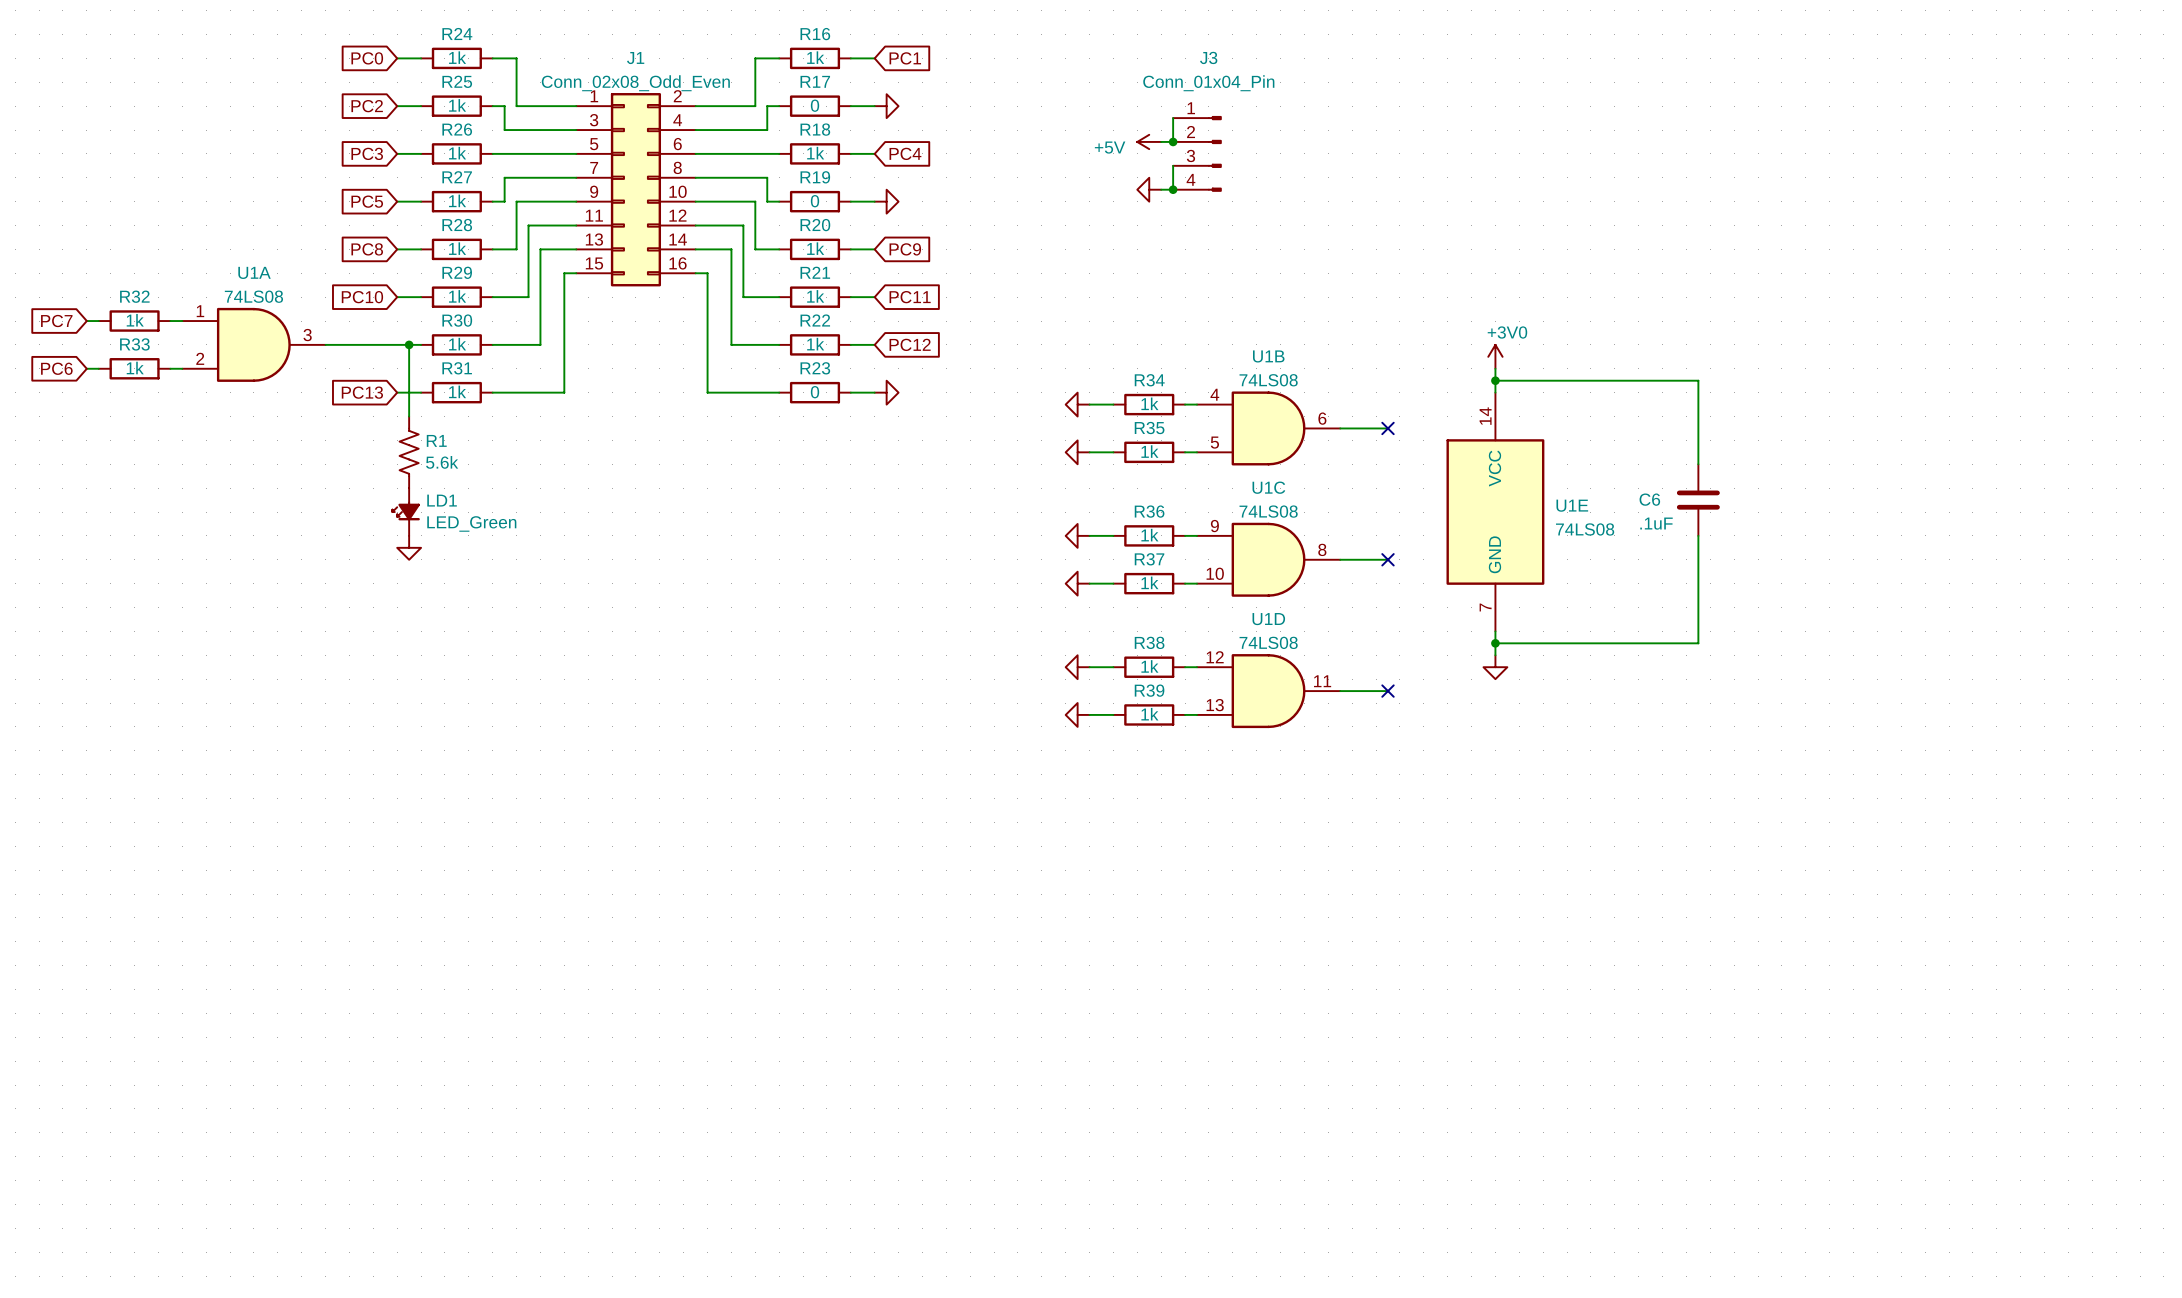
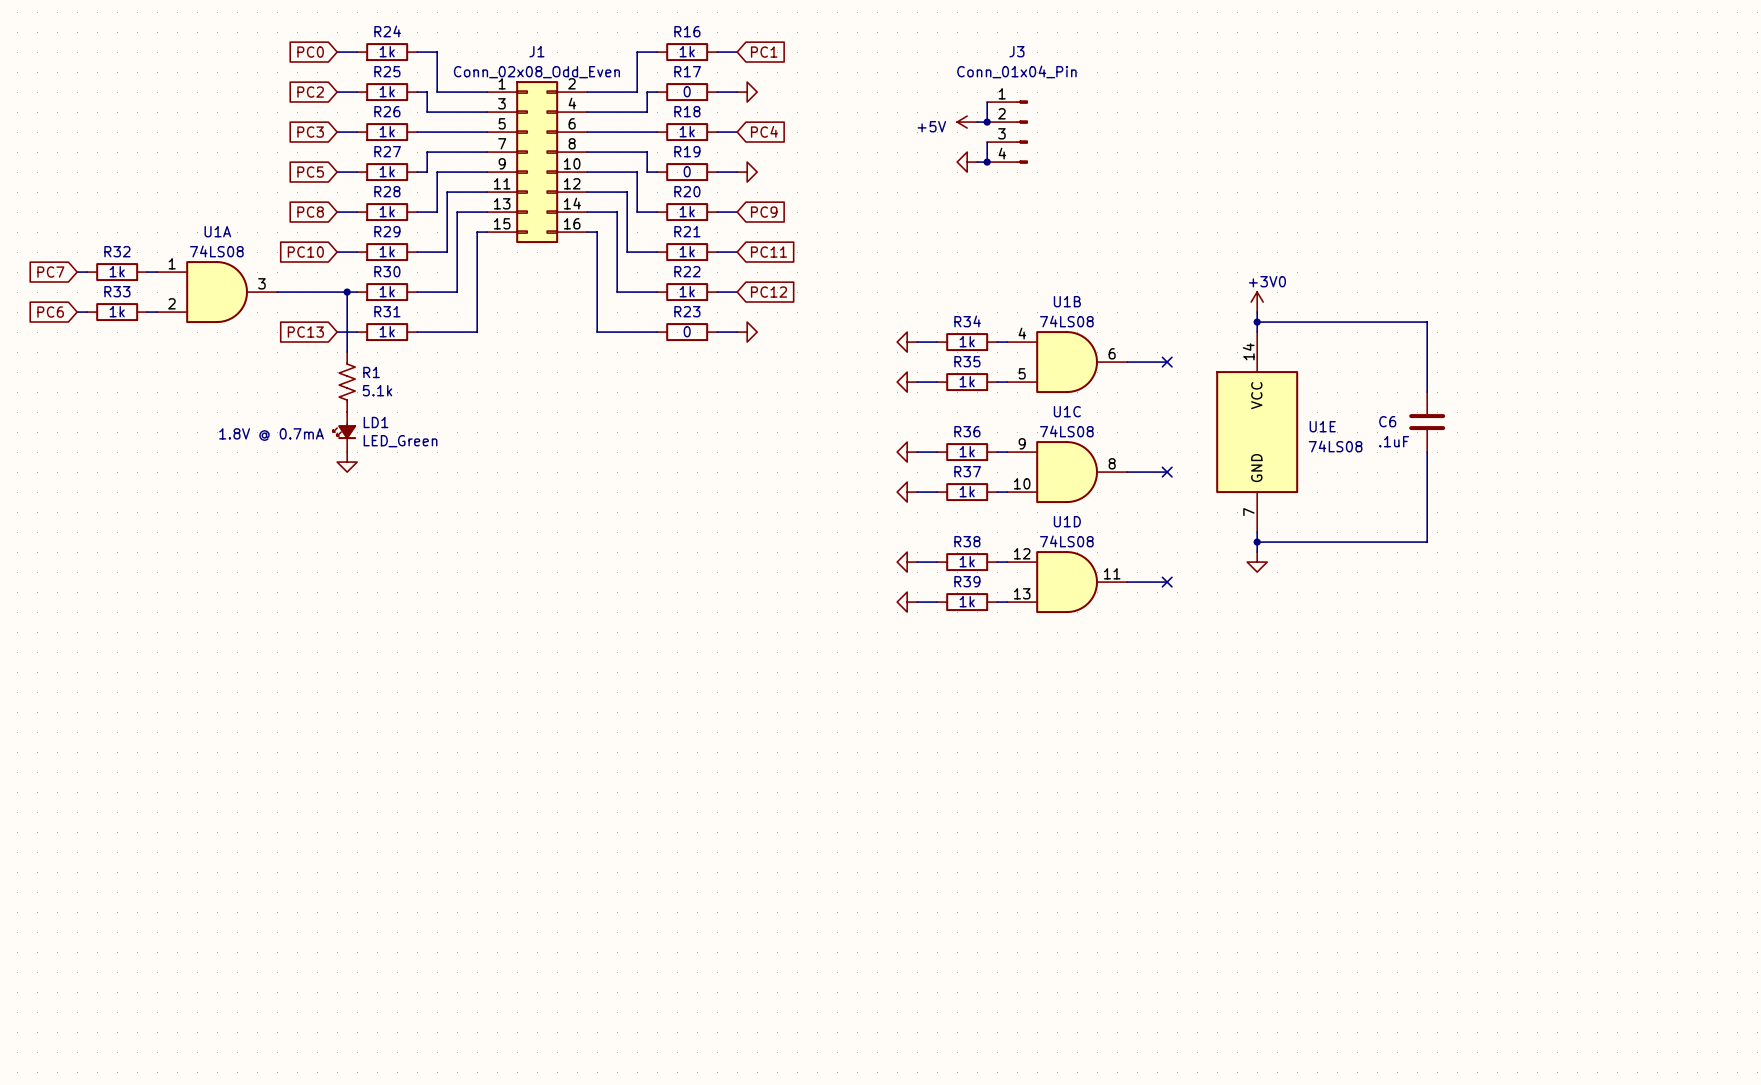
R1 value: 5.6k (442, 462) -> 5.1k (377, 390)
text: none -> 1.8V @ 0.7mA (271, 434)

